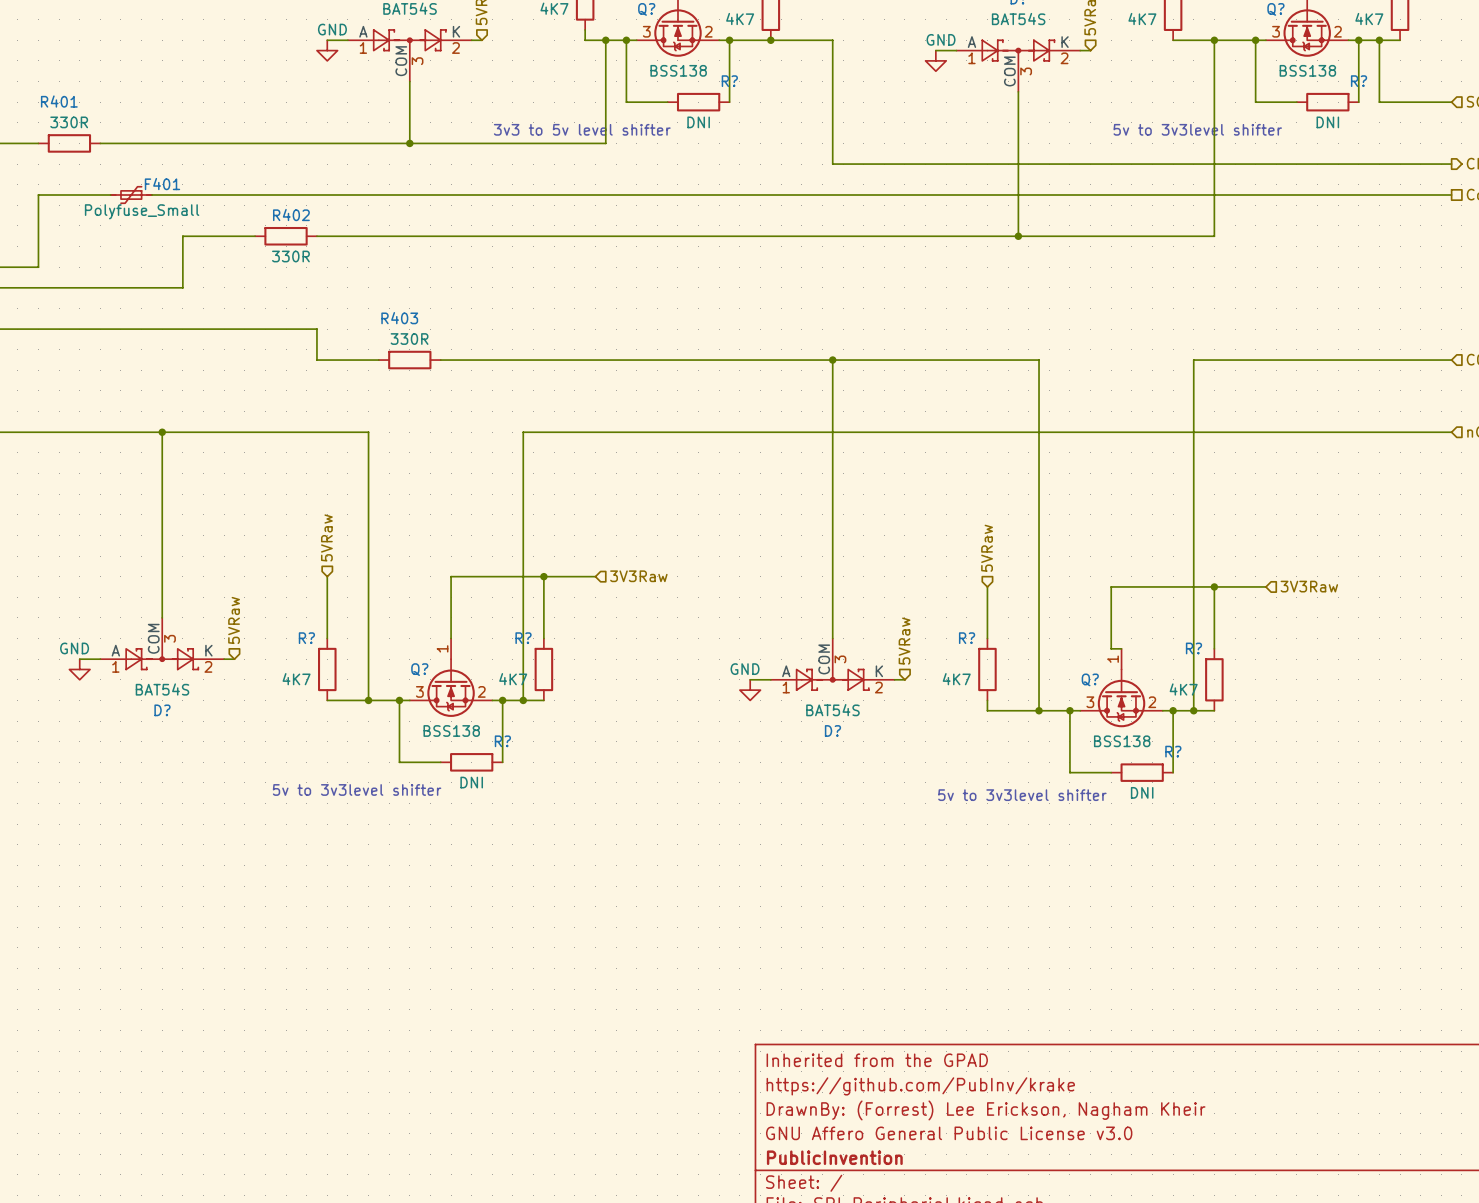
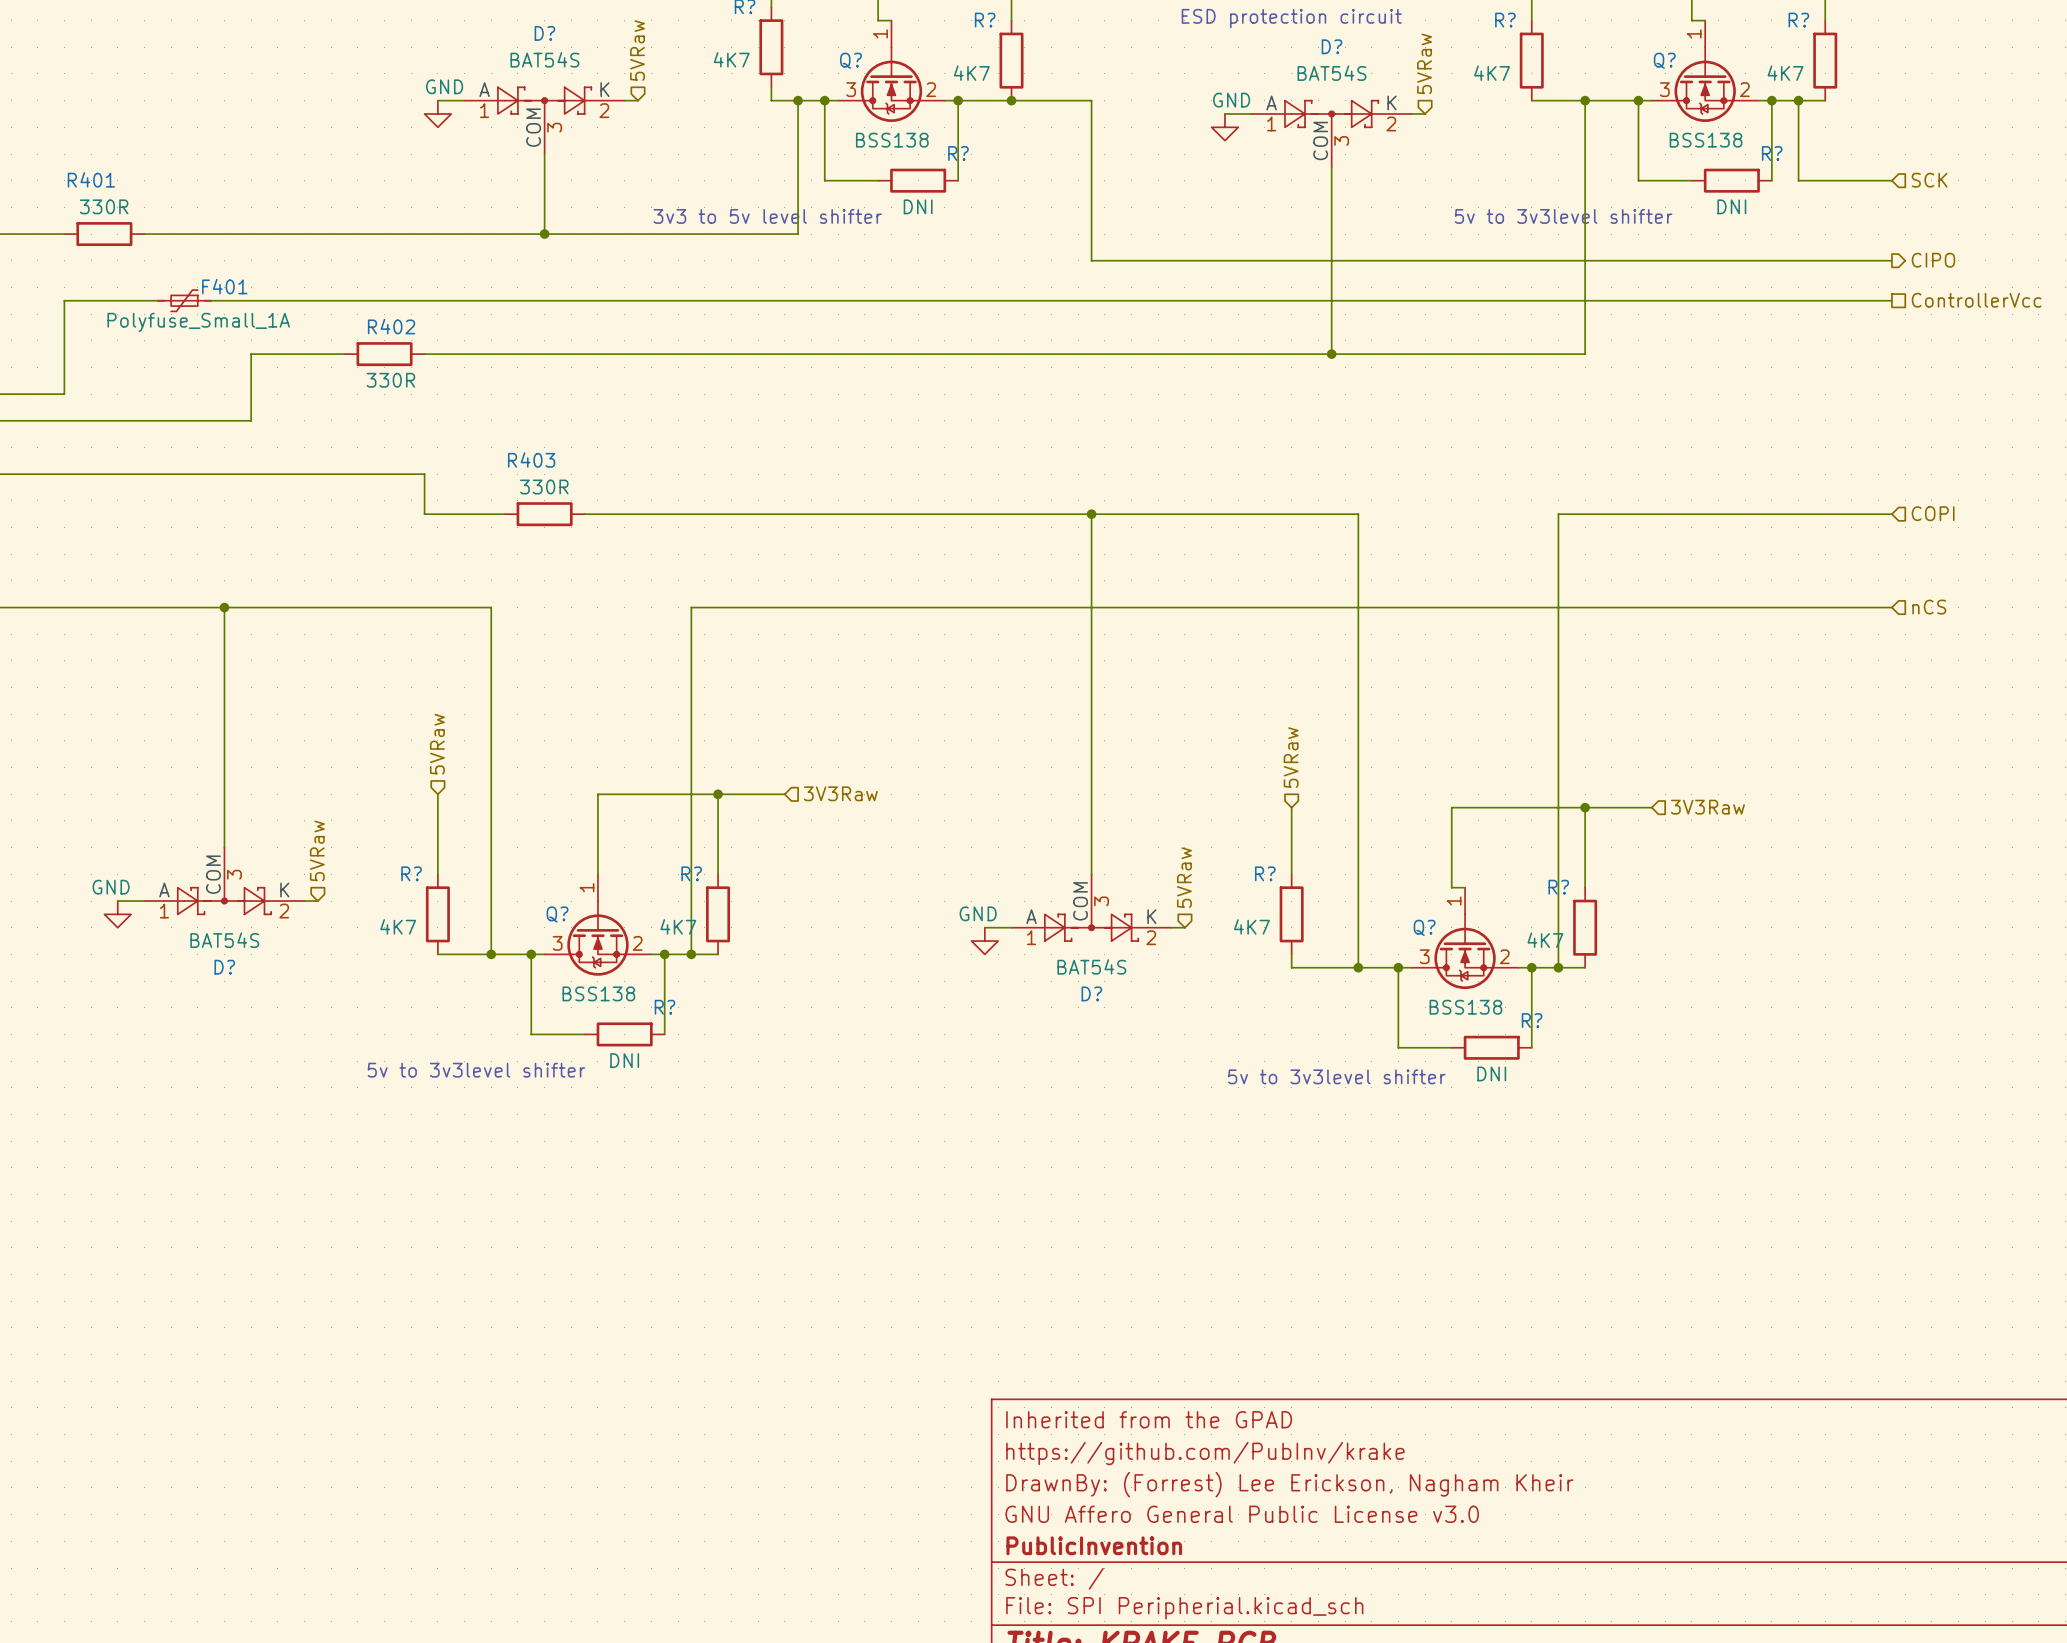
F401 value: Polyfuse_Small (142, 211) -> Polyfuse_Small_1A (198, 322)

